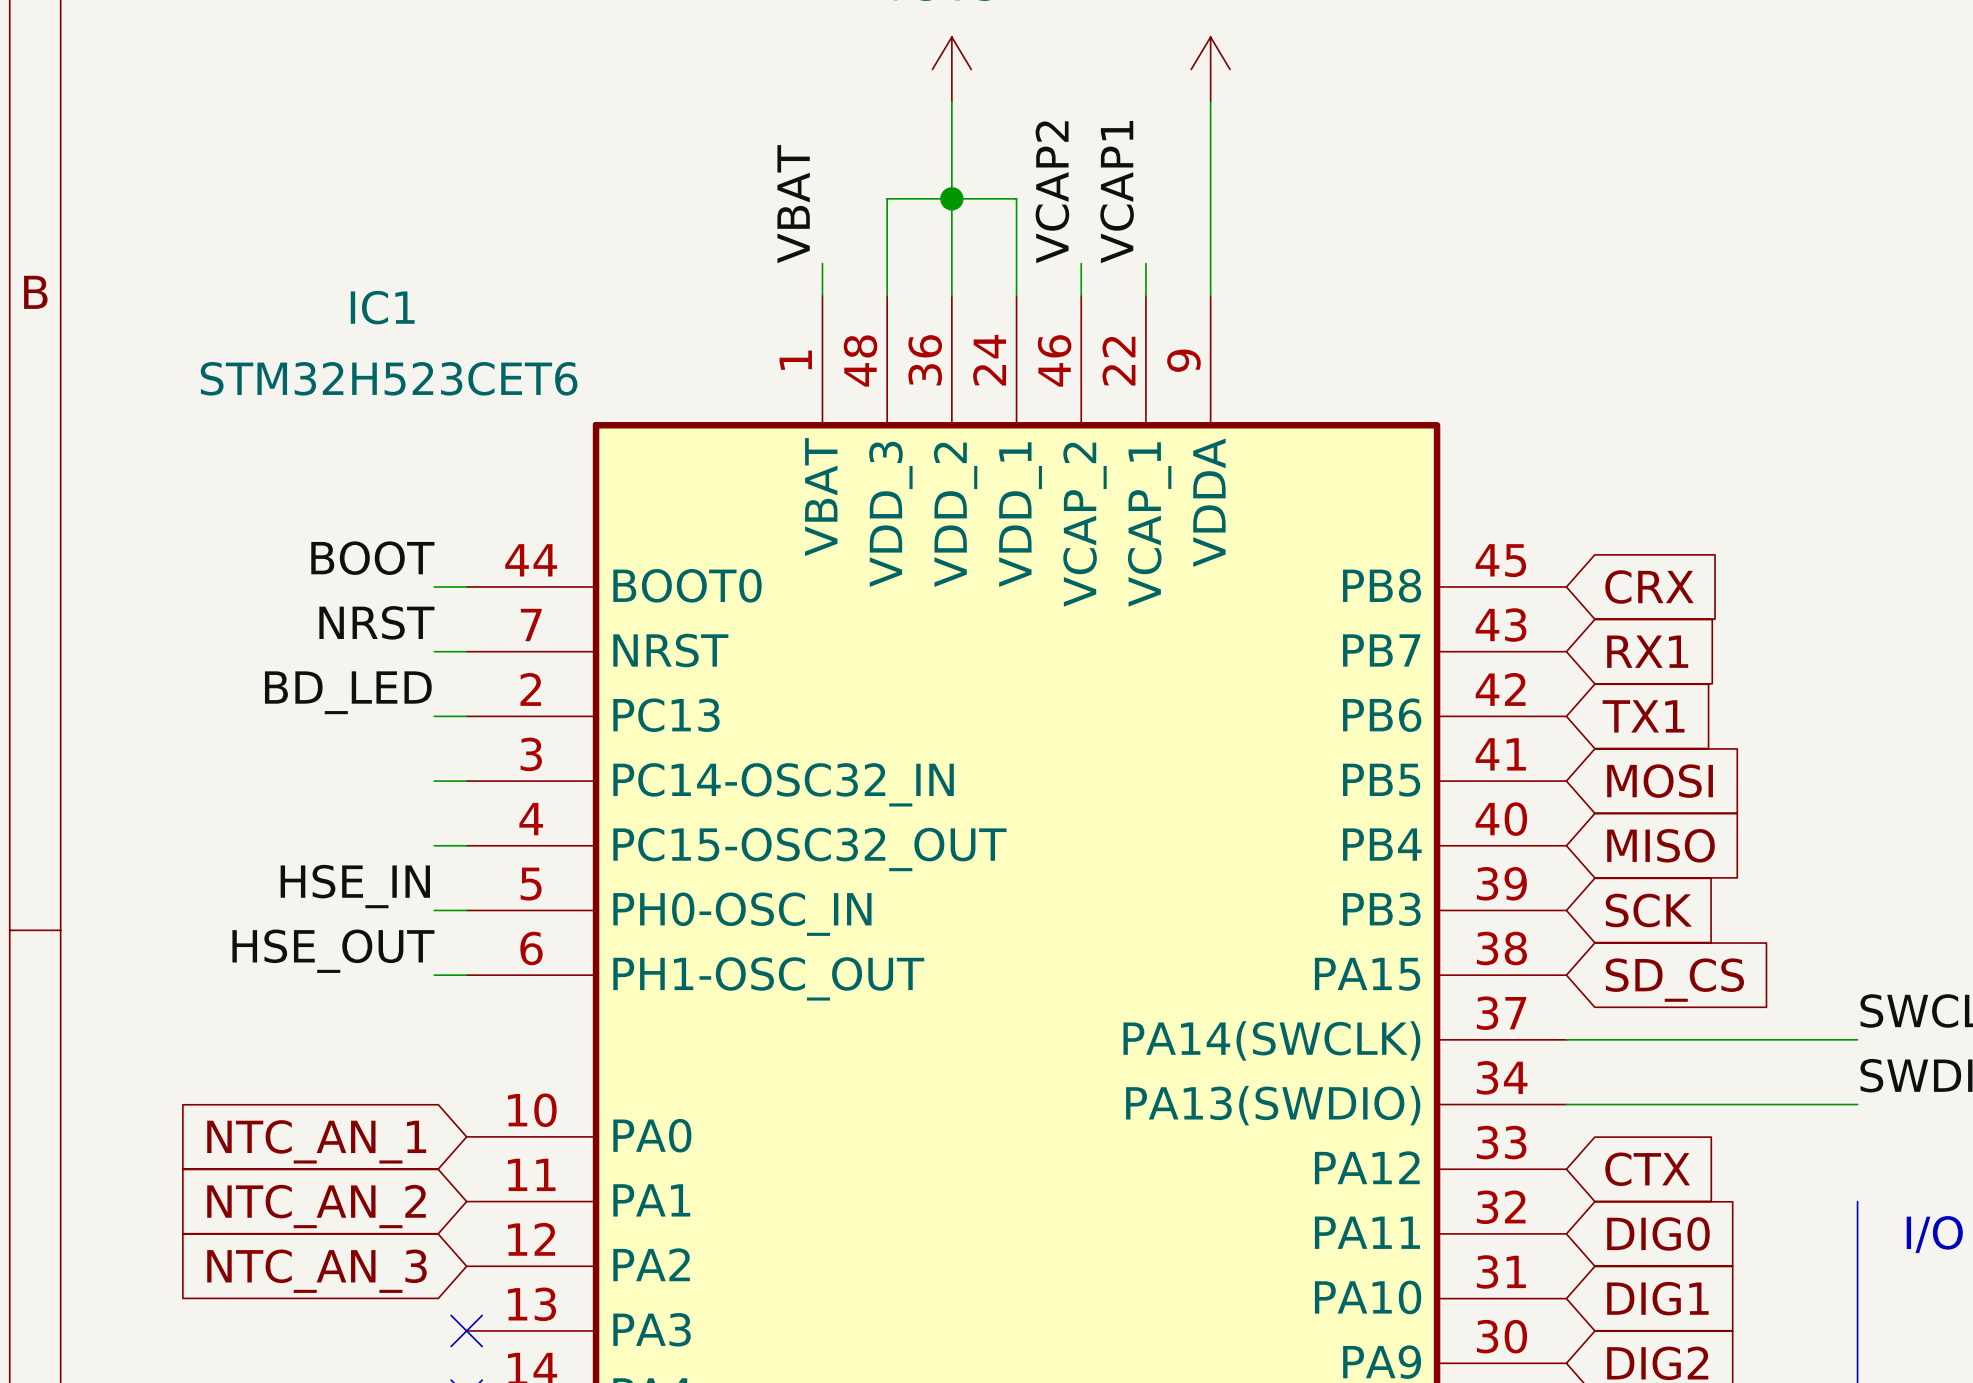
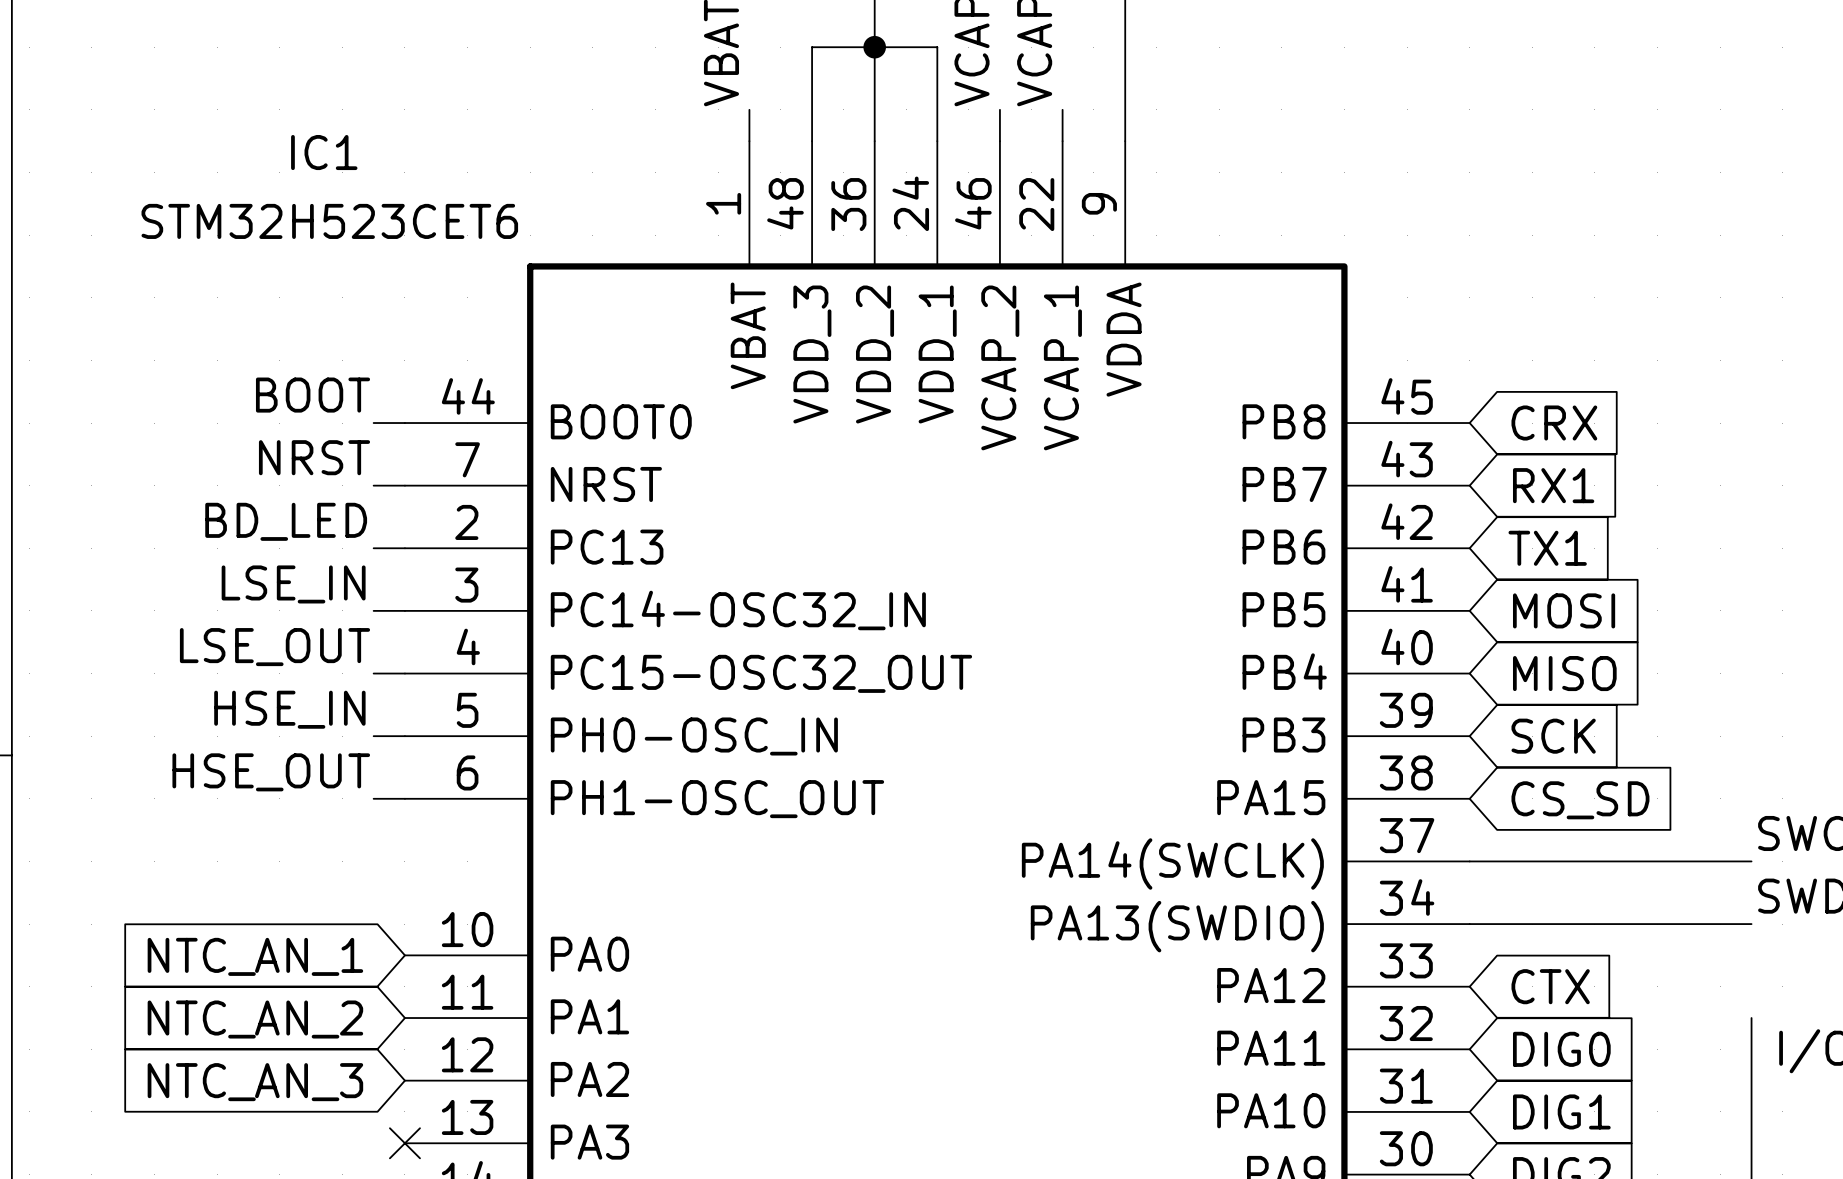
label: none -> LSE_IN (293, 584)
label: none -> LSE_OUT (274, 647)
global label: SD_CS (1674, 980) -> CS_SD (1580, 800)

